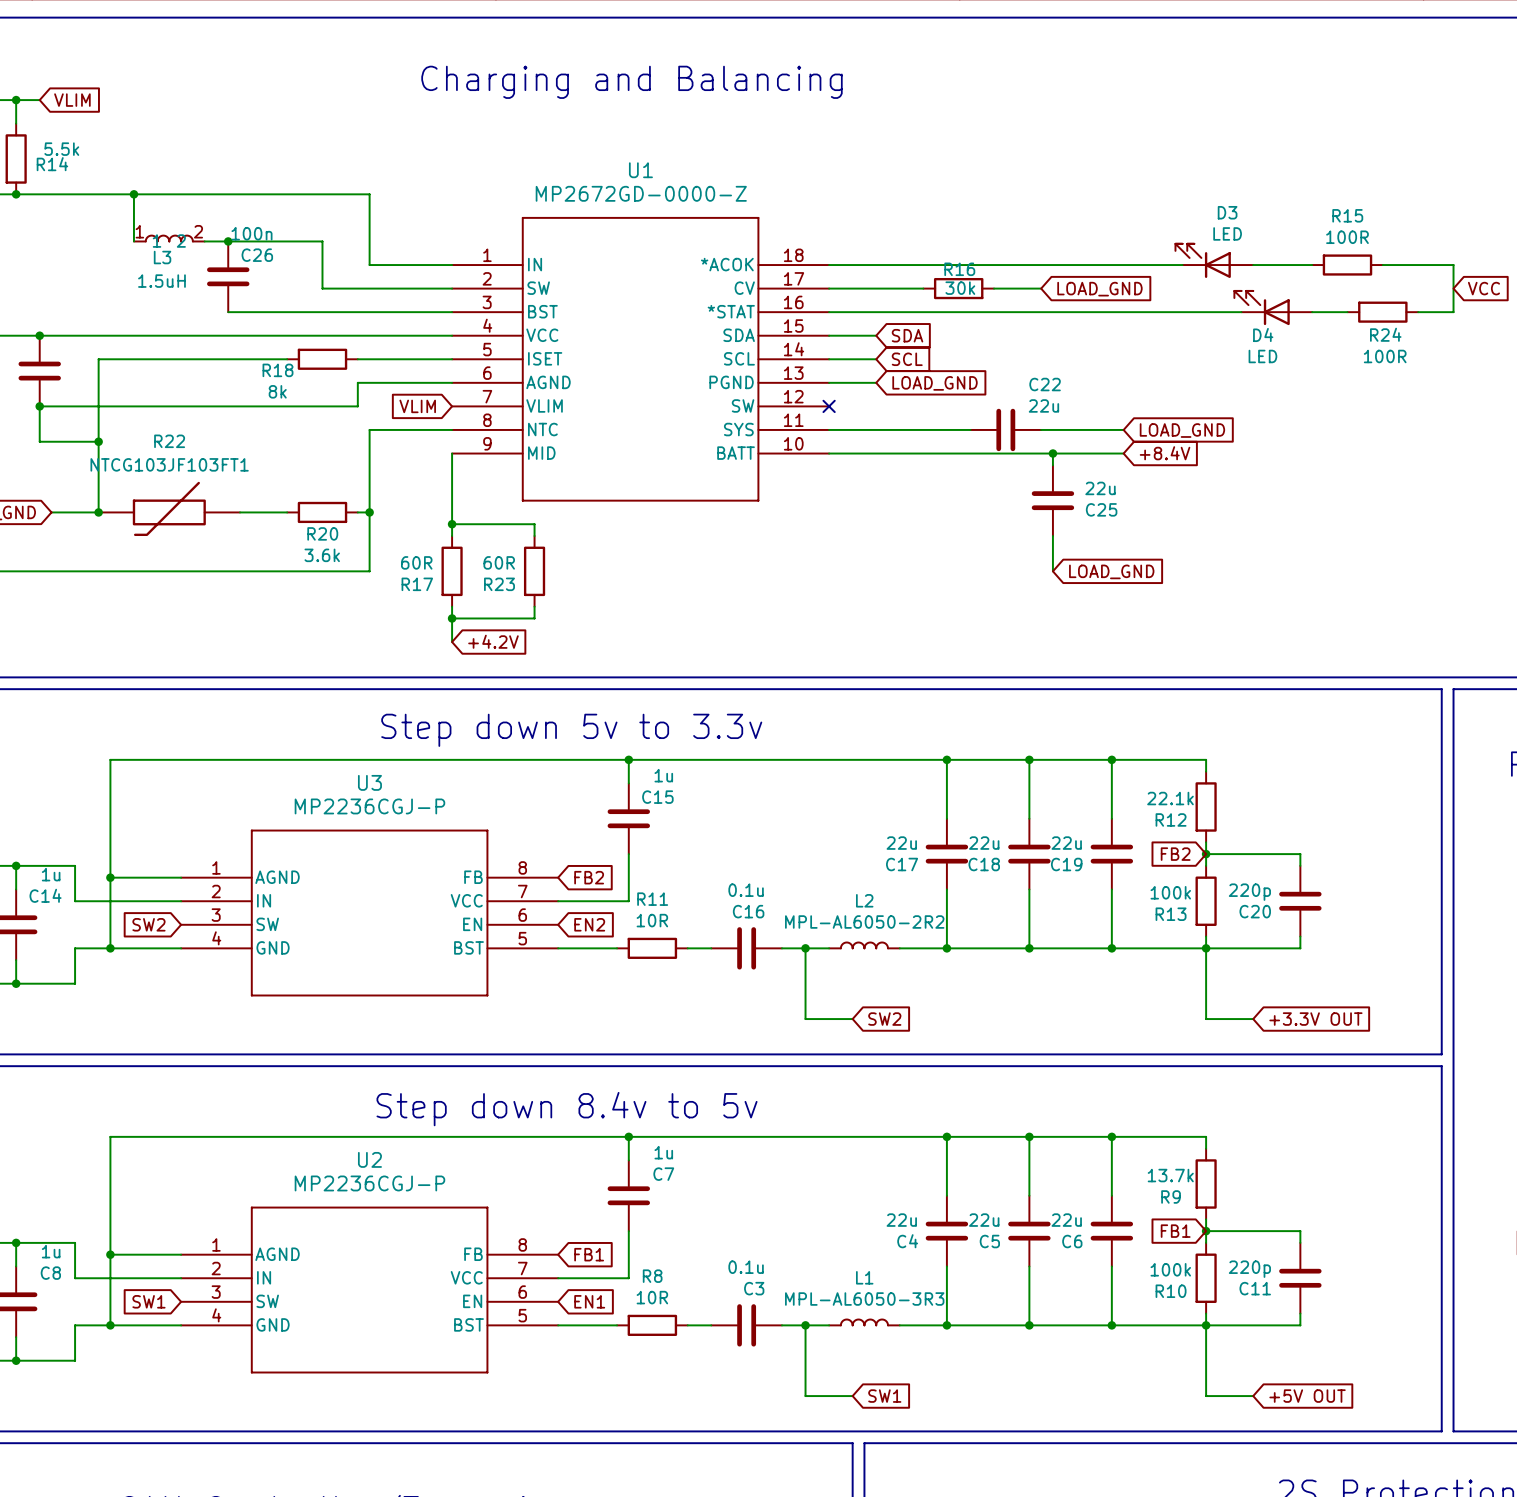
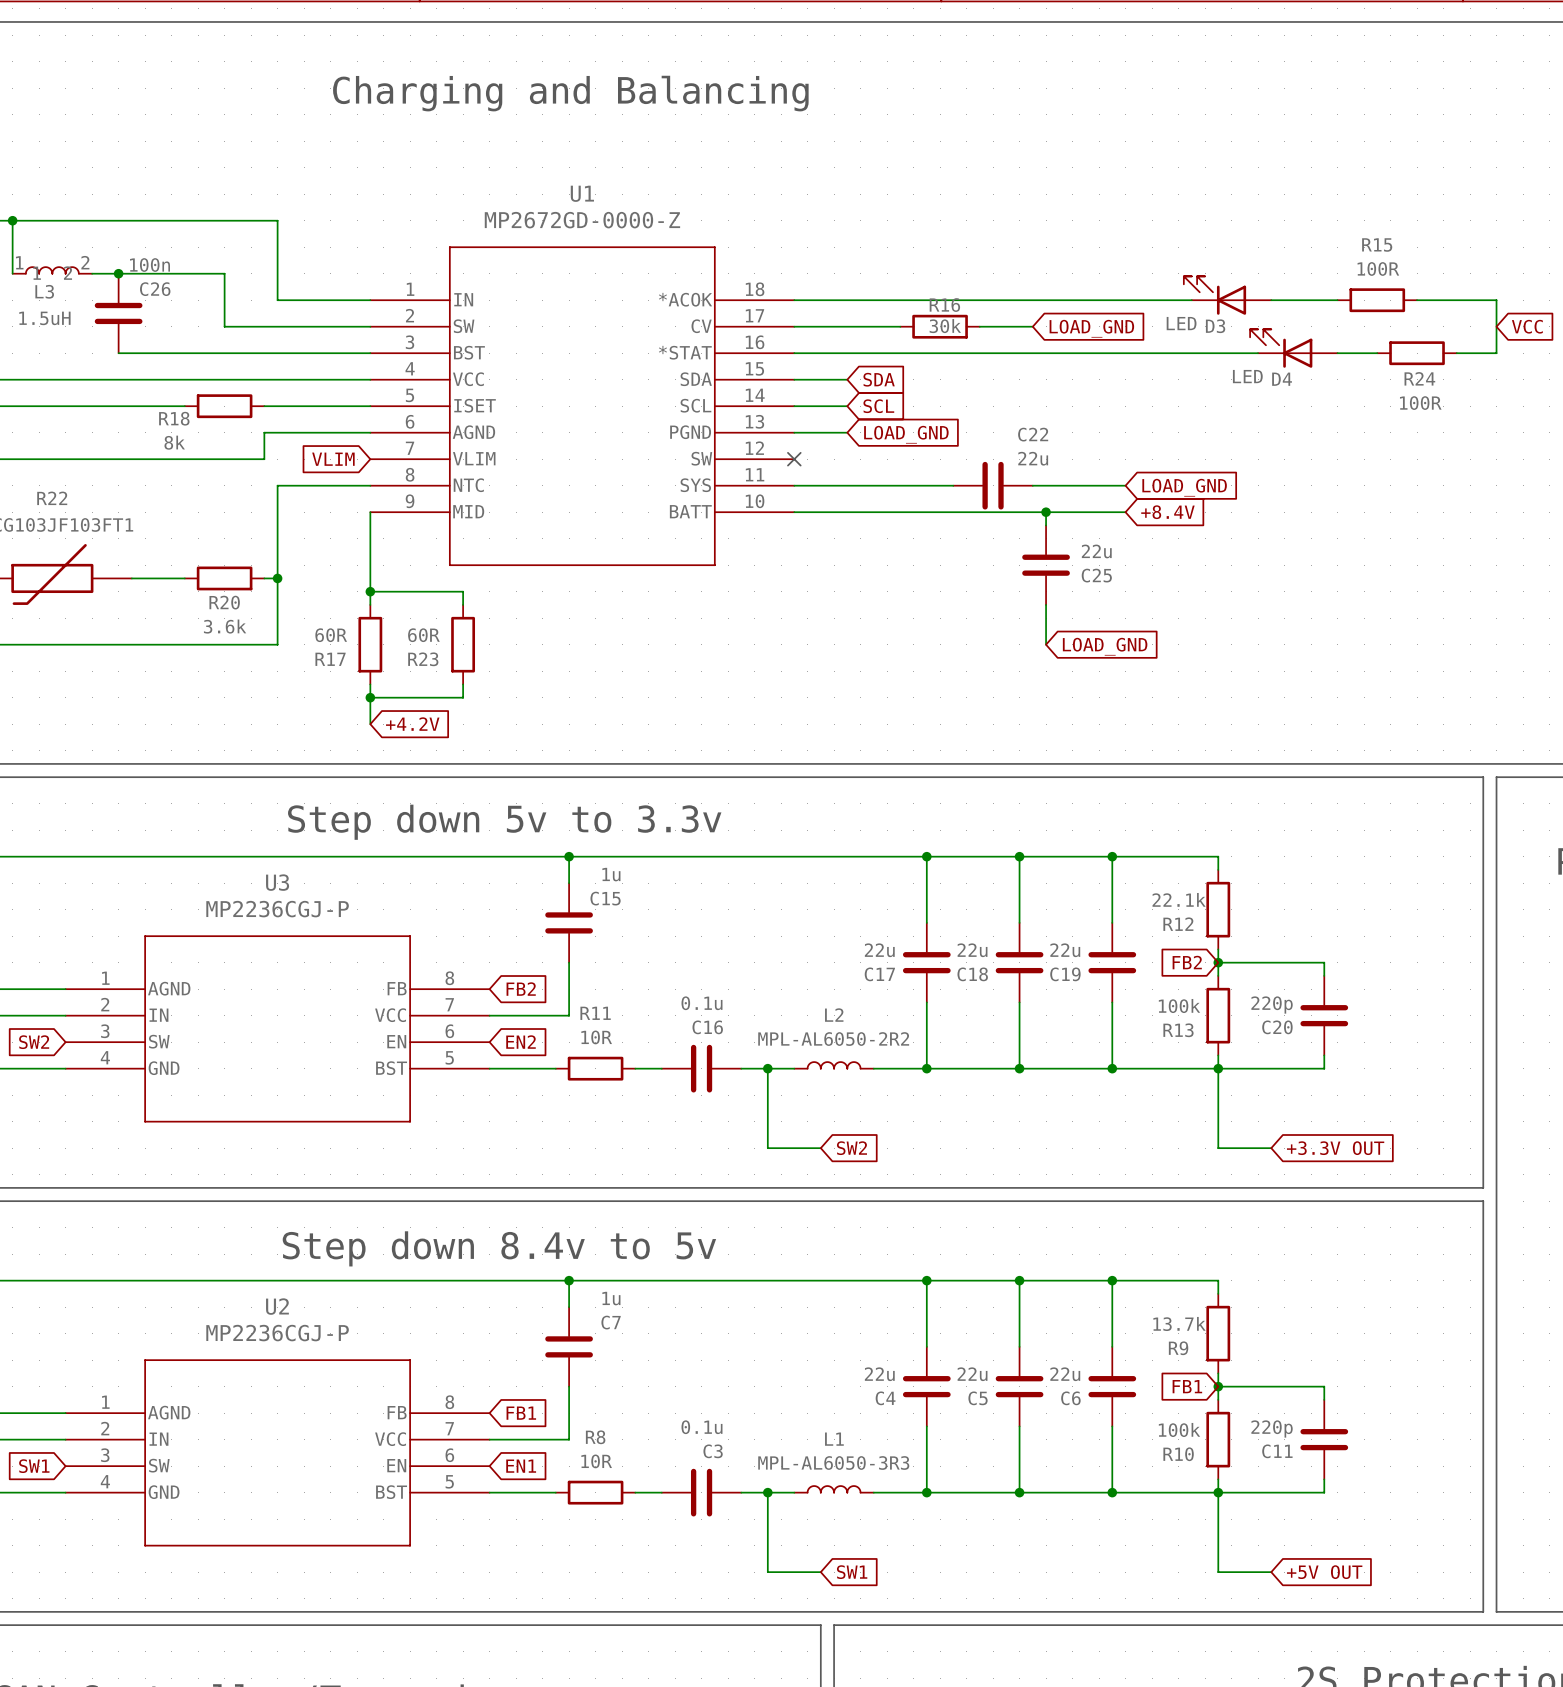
D3 name position: D3 (1227, 212) -> D3 (1215, 326)
D3 value position: LED (1227, 233) -> LED (1181, 323)
D4 value position: LED (1262, 356) -> LED (1247, 376)

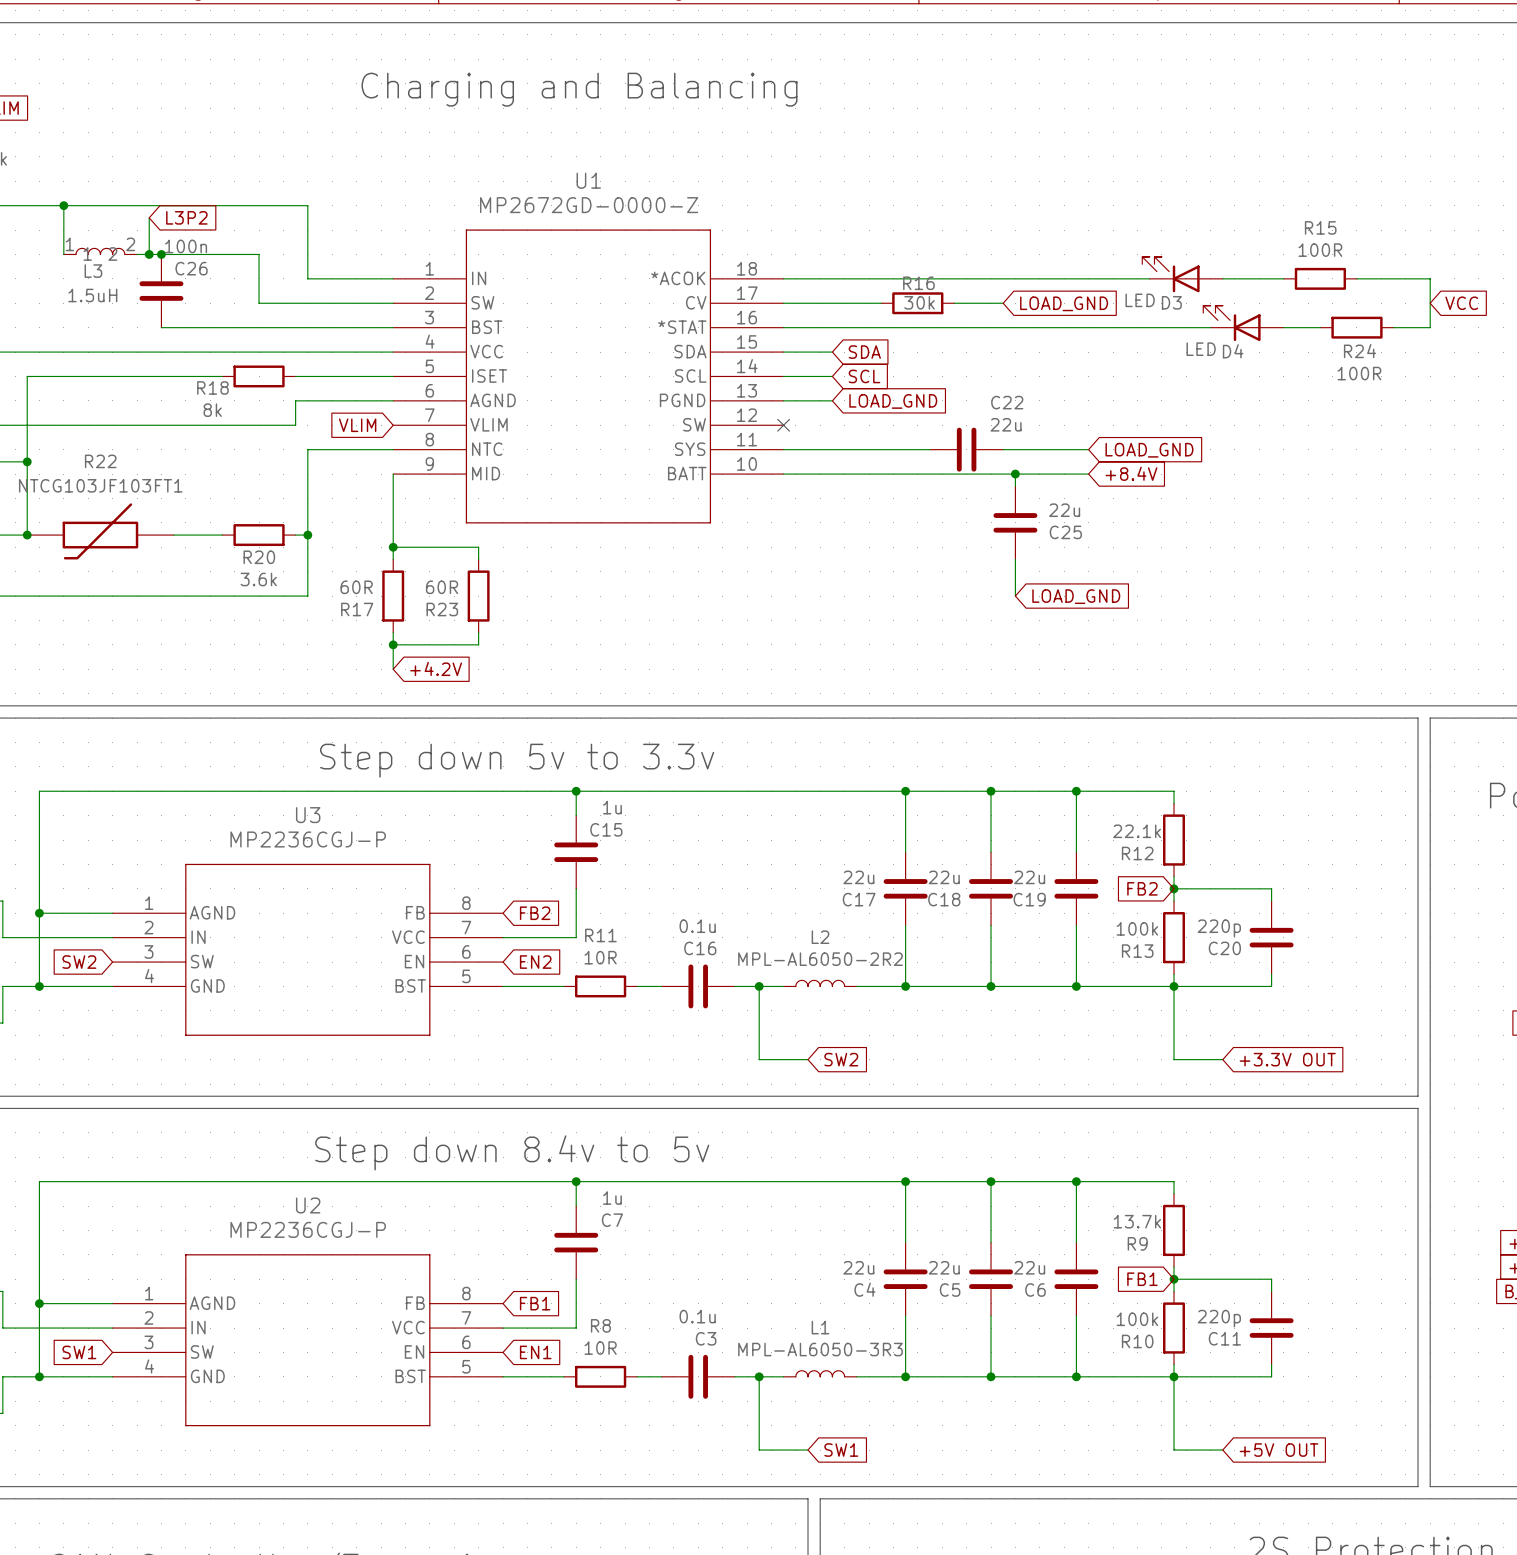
wire: none -> (149, 217) (149, 254)
global label: none -> L3P2 (186, 217)
junction: none -> (149, 254)

